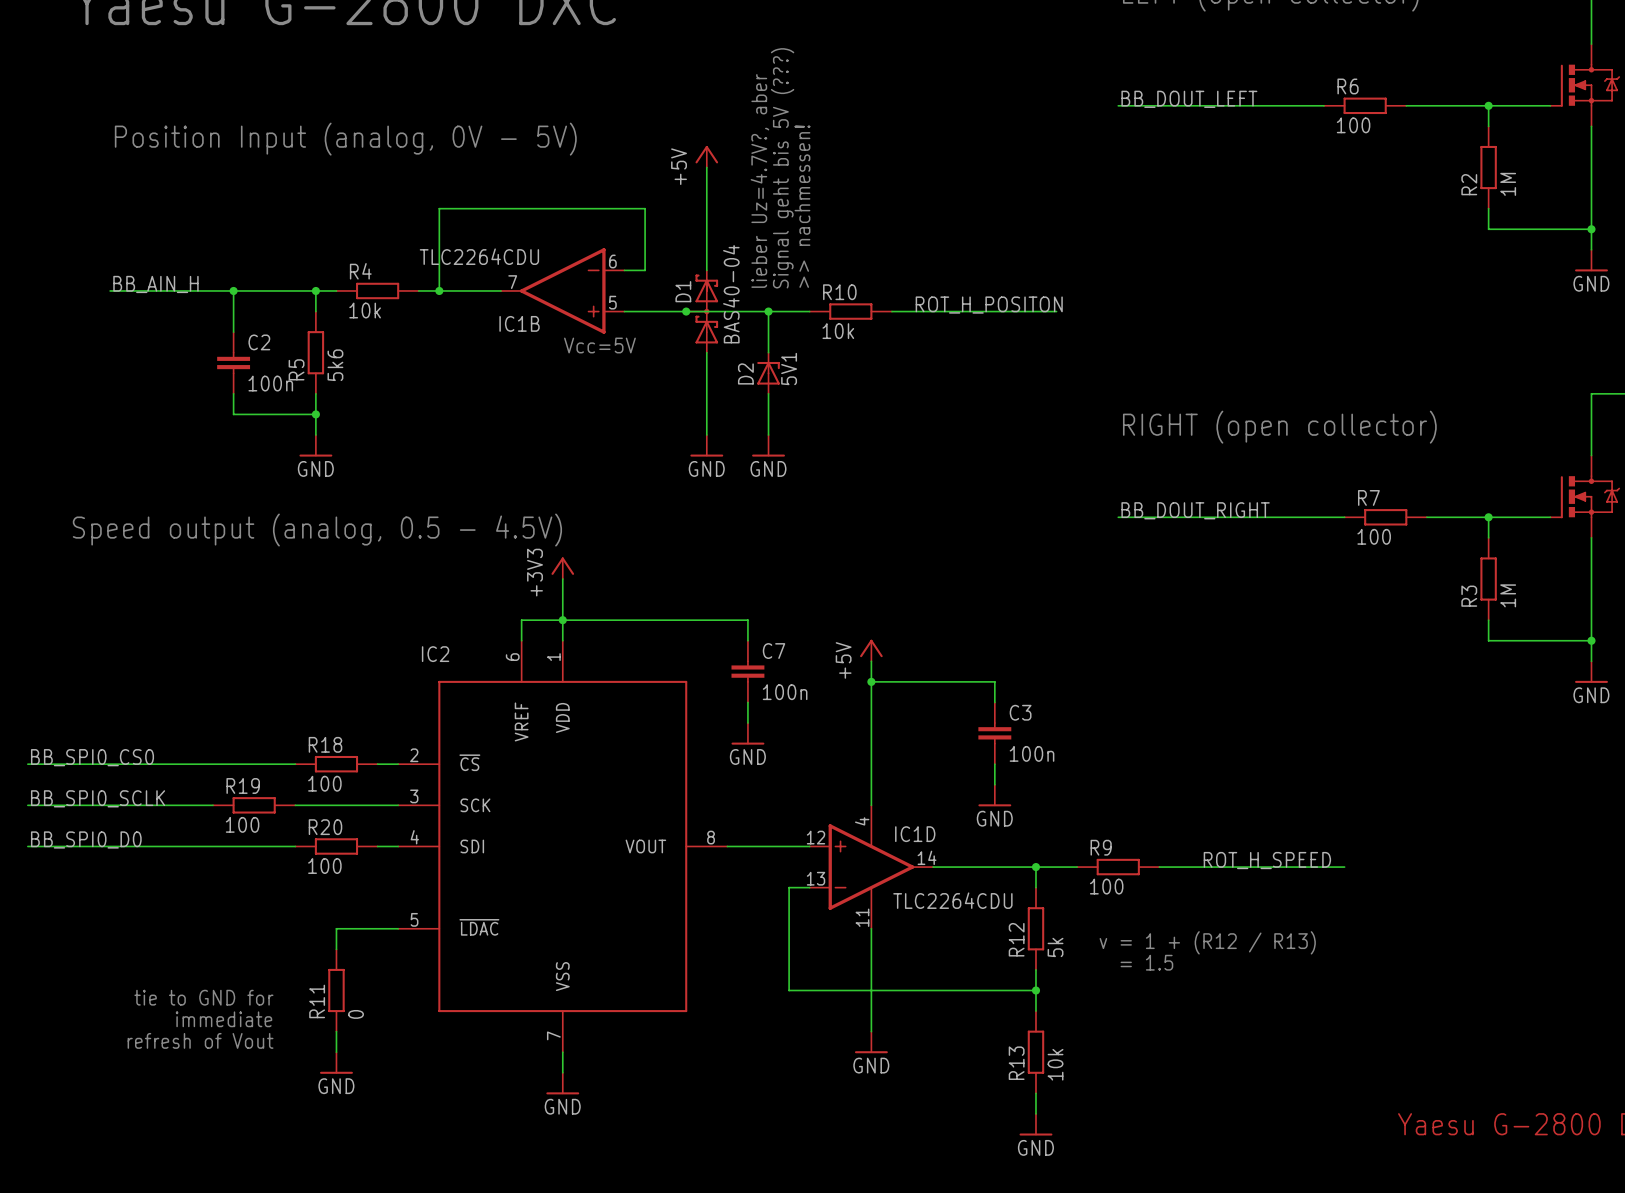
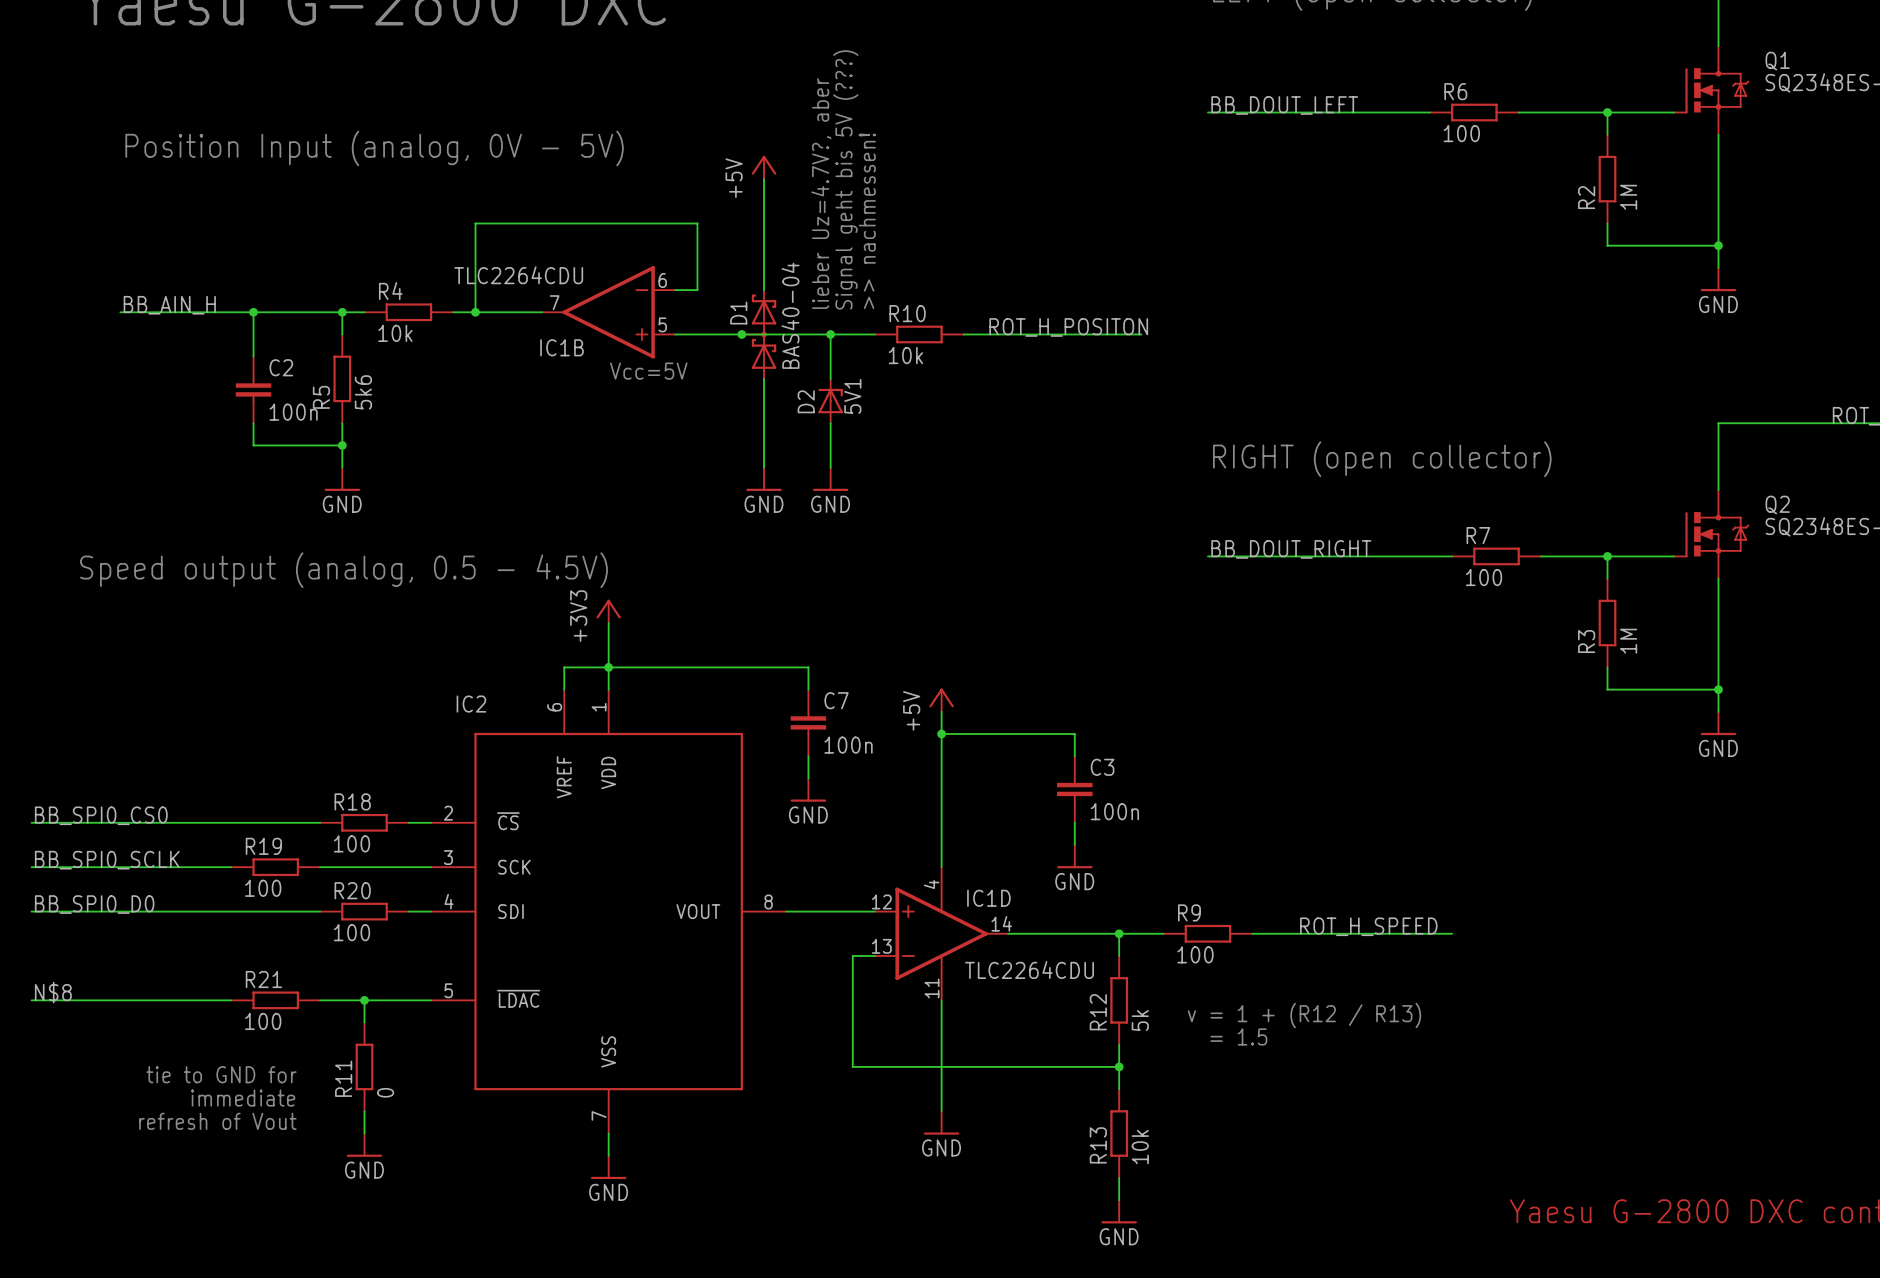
label: none -> N$8 (53, 992)
wire: none -> (31, 1000) (231, 1000)
R21: none -> 100 (275, 1000)
wire: none -> (320, 1000) (364, 1000)
junction: none -> (364, 1000)

